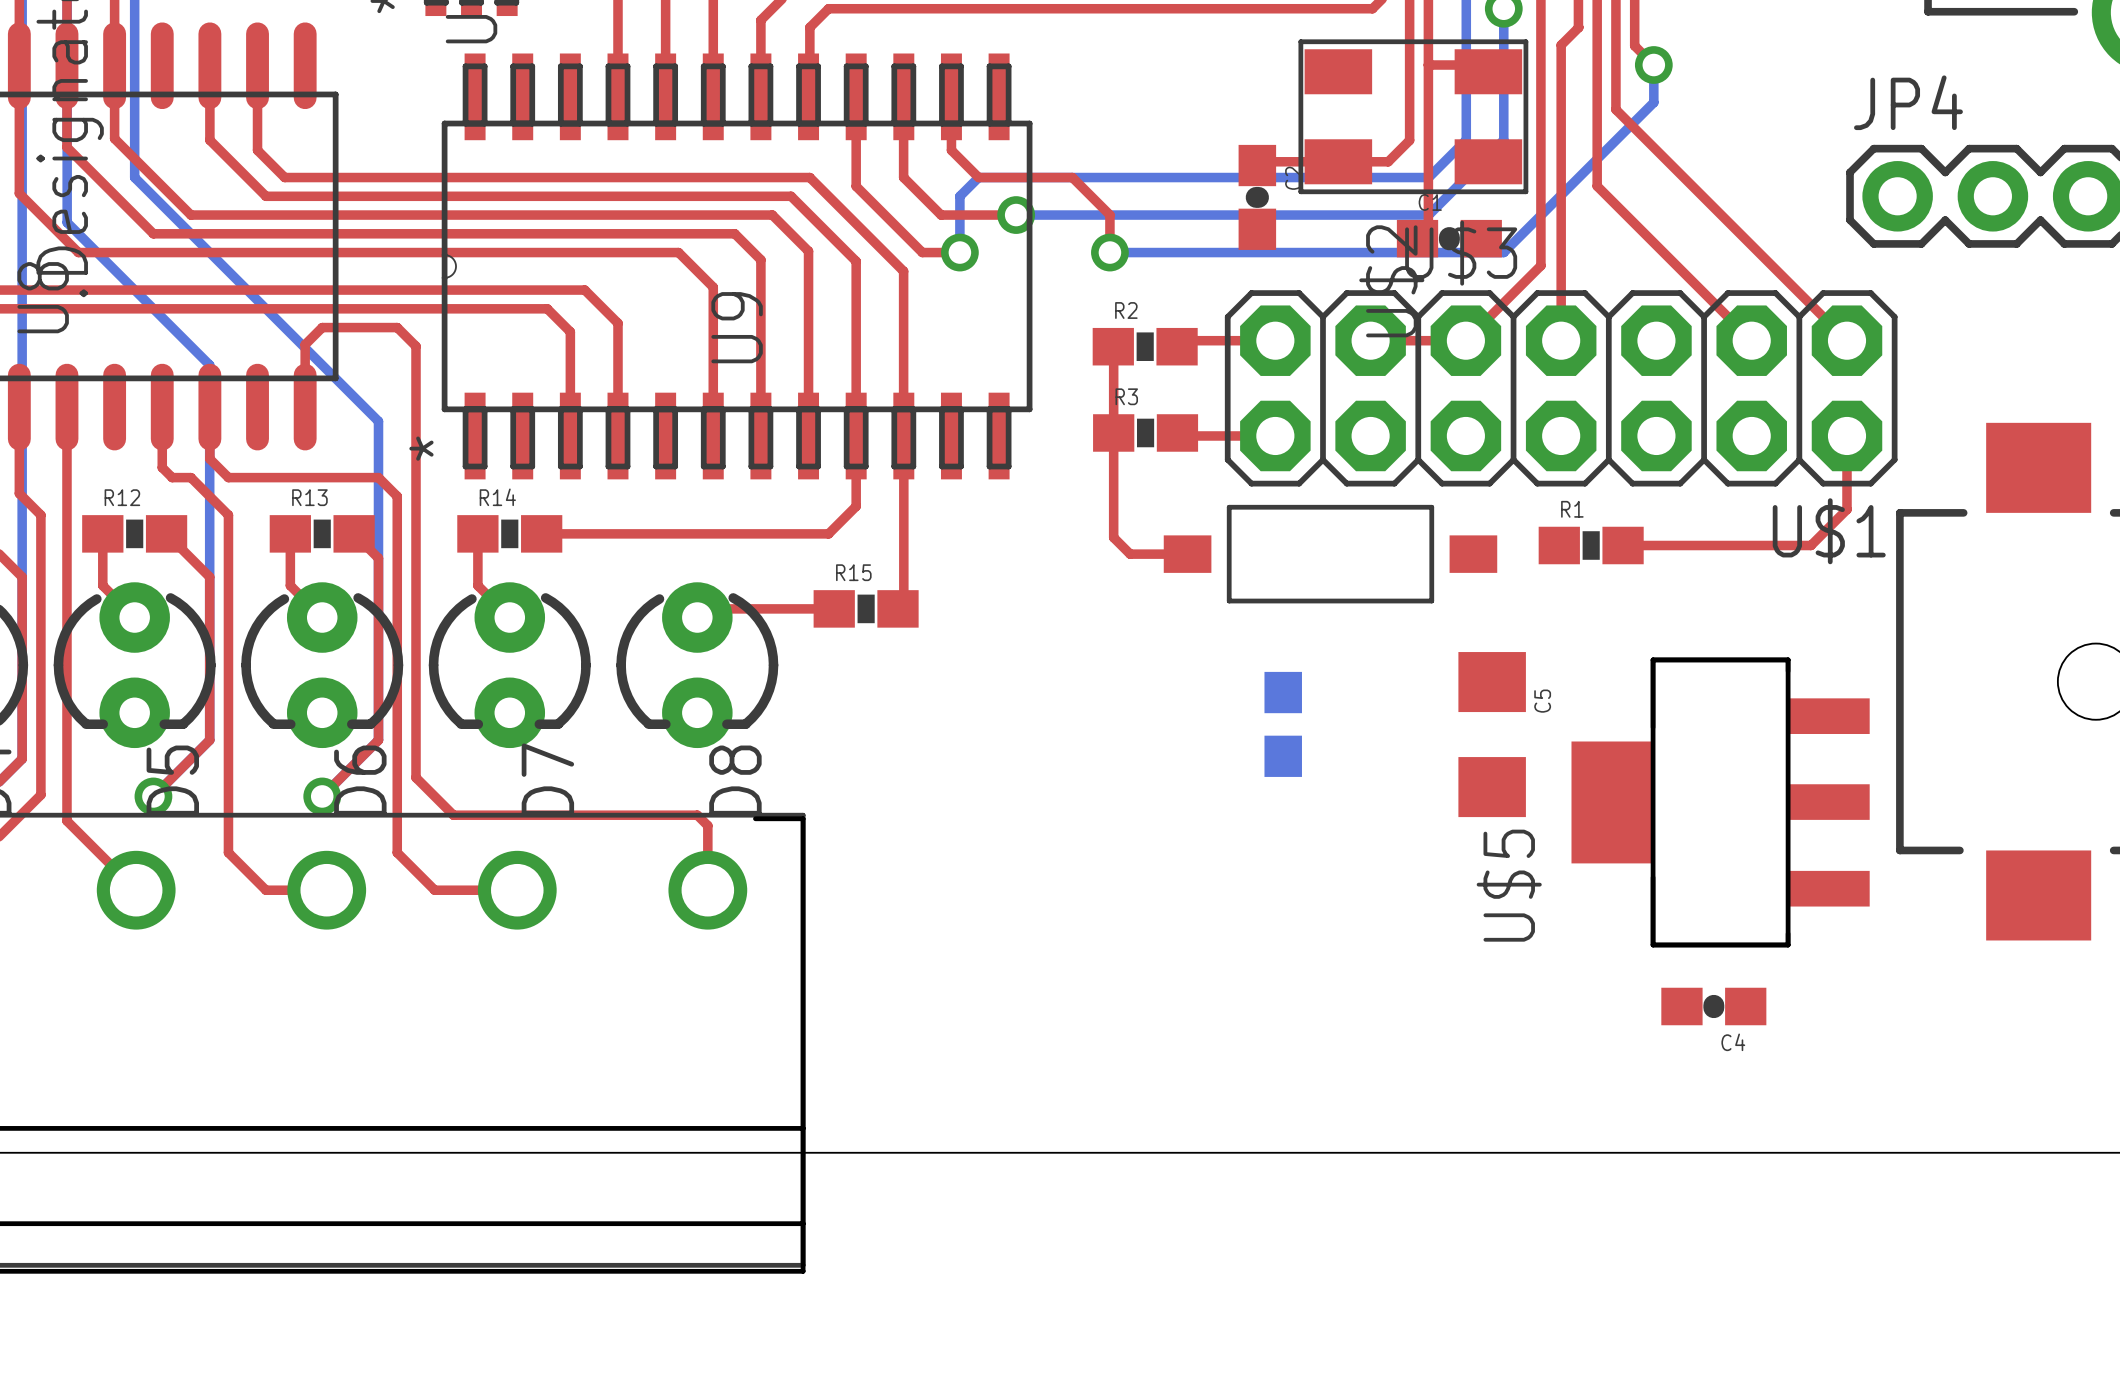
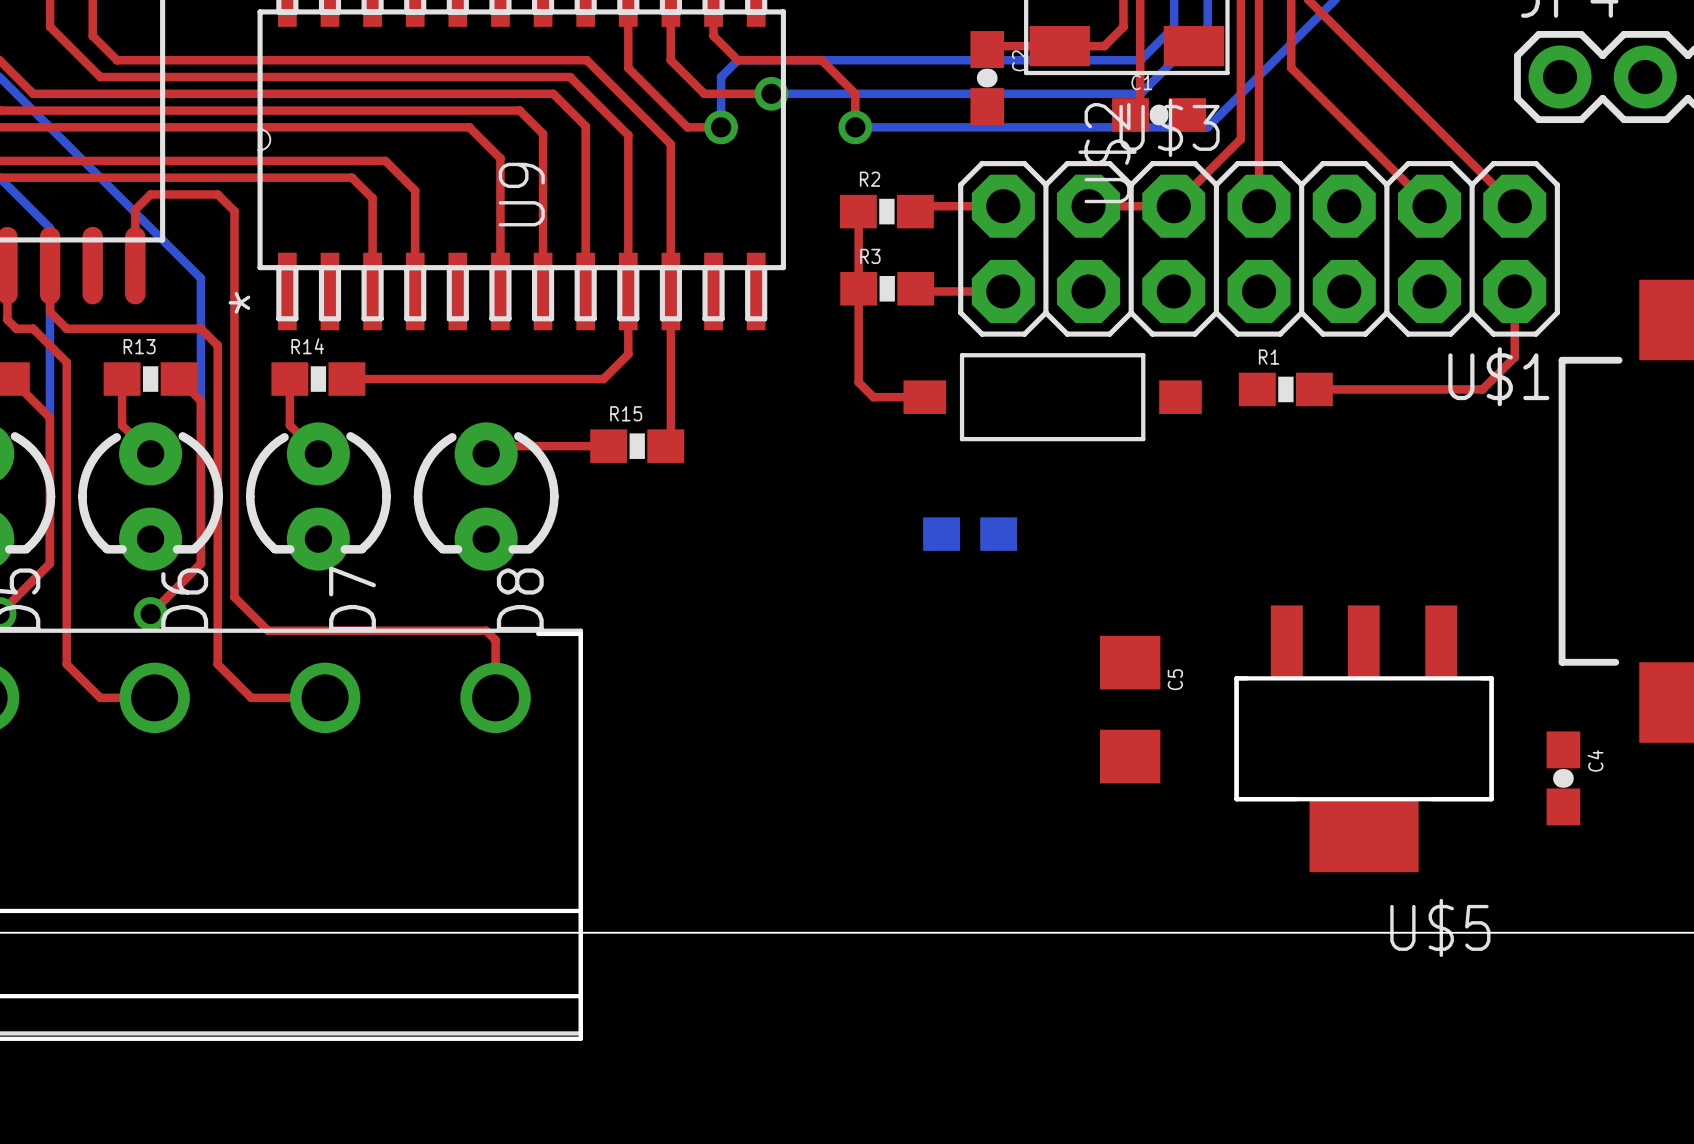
part rotation: 0° (1283, 724) -> 90° clockwise (970, 534)
C5 position: (1492, 734) -> (1130, 709)
U$5 rotation: 0° (1720, 802) -> 90° counterclockwise (1364, 738)
C4 rotation: 0° (1713, 1006) -> 90° clockwise (1563, 778)
C4 position: (1713, 1006) -> (1563, 778)

